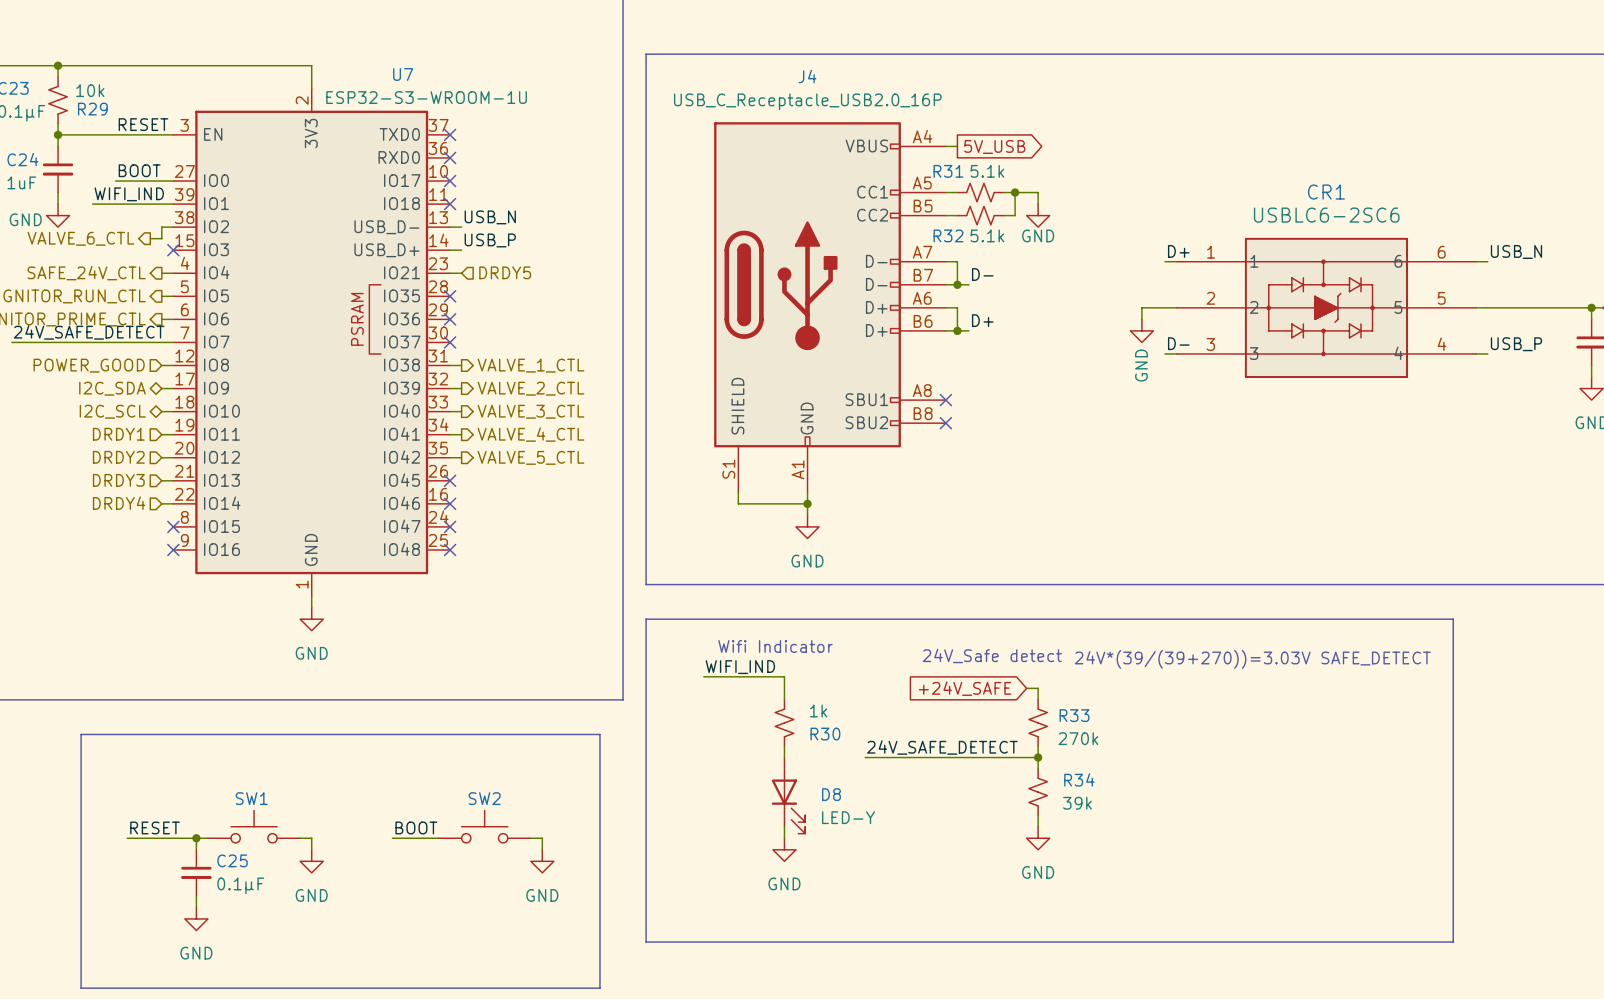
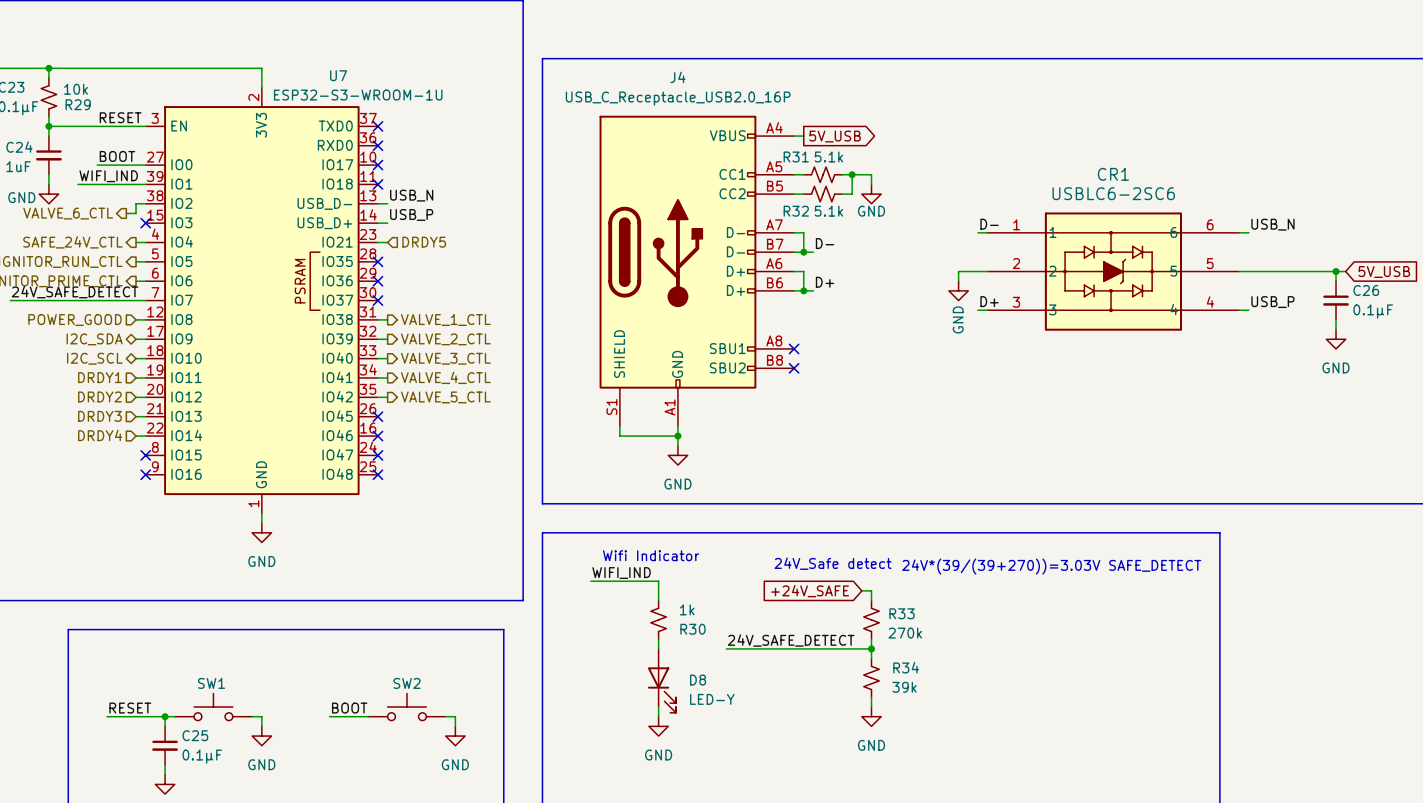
label: D+ (1178, 251) -> D- (989, 224)
label: D- (1178, 343) -> D+ (989, 301)

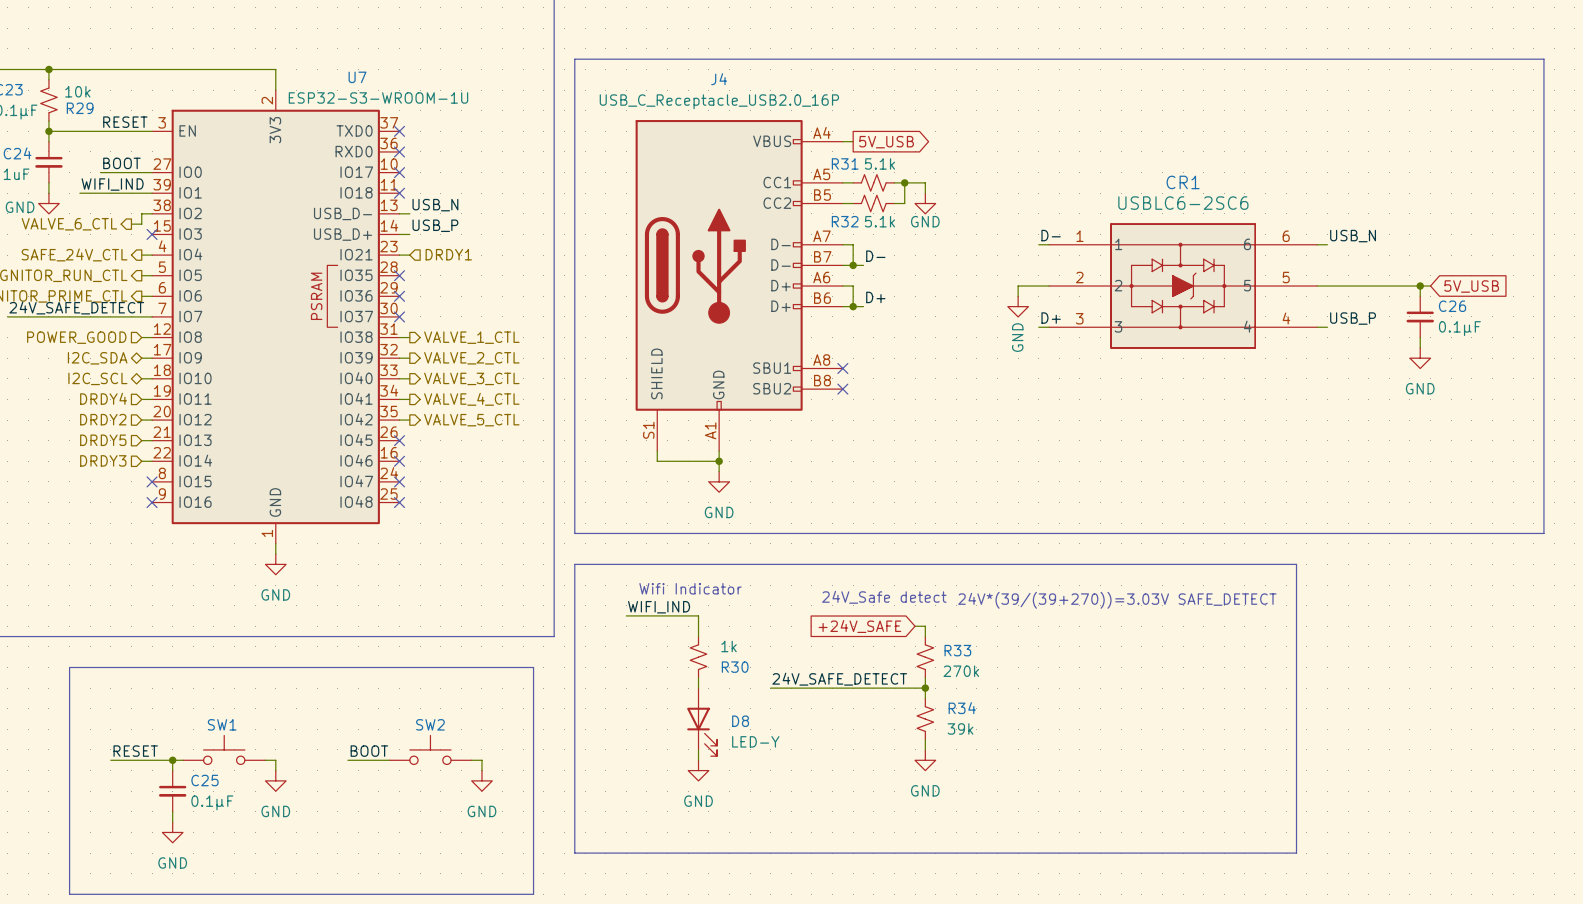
hierarchical label: DRDY5 (424, 242) -> DRDY1 (448, 254)
hierarchical label: DRDY1 (99, 377) -> DRDY4 (103, 398)
hierarchical label: DRDY3 (99, 416) -> DRDY5 (103, 440)
hierarchical label: DRDY4 (100, 435) -> DRDY3 (103, 460)

